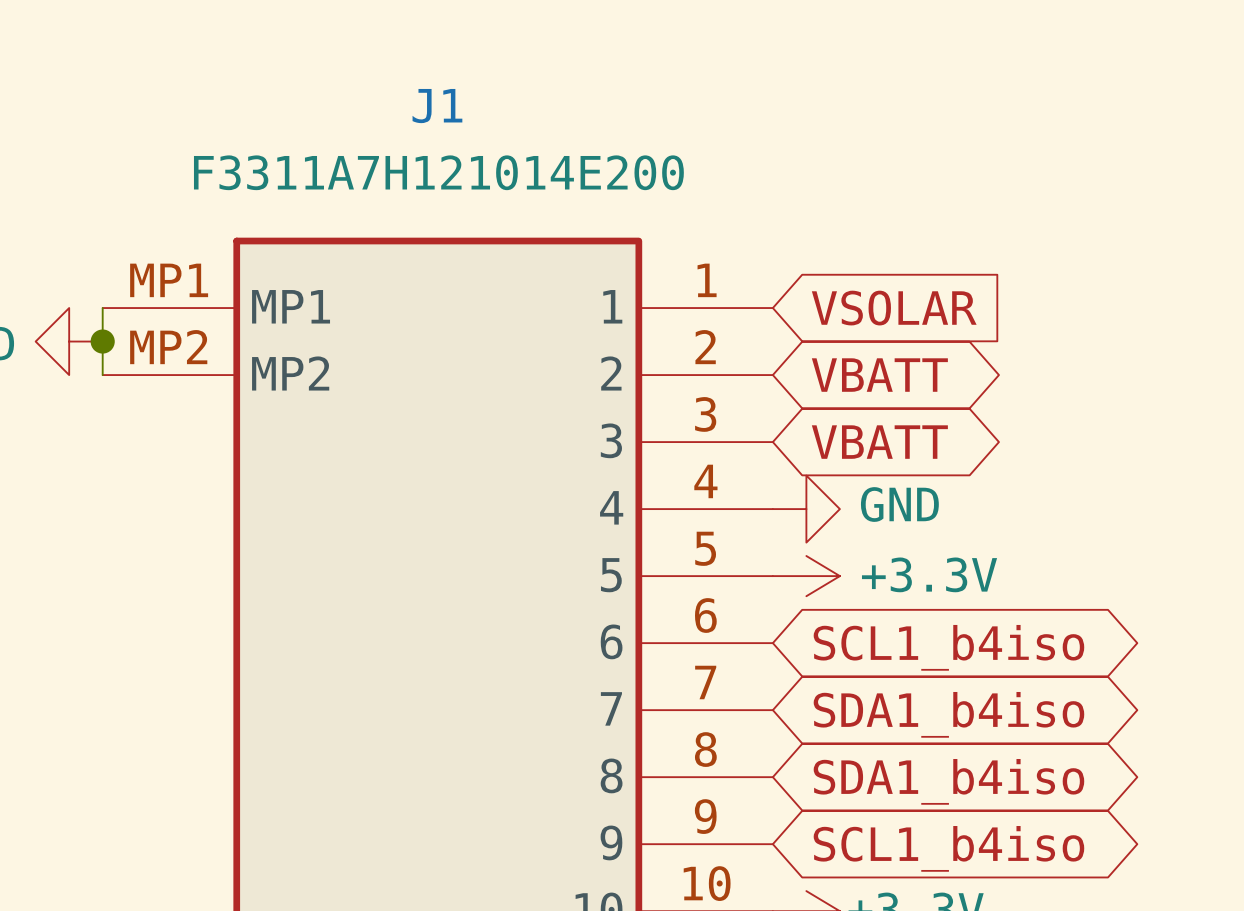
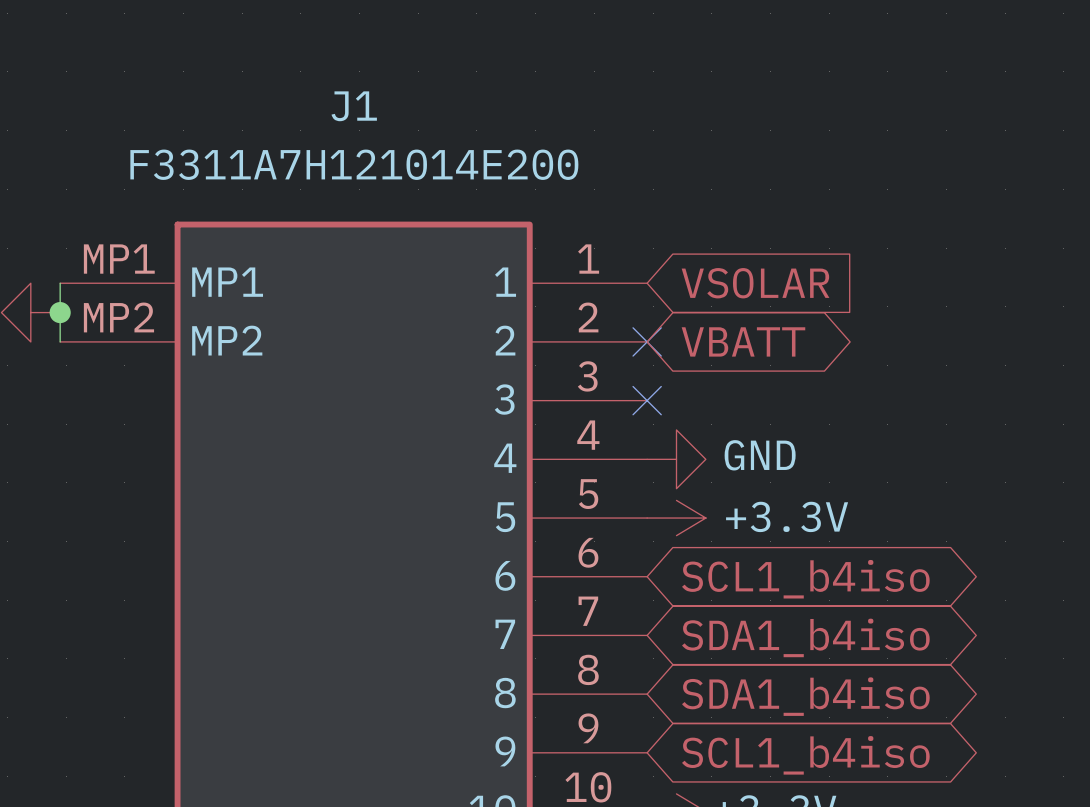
no-connect mark: none -> (647, 341)
no-connect mark: none -> (647, 400)
global label: VBATT (879, 442) -> none

